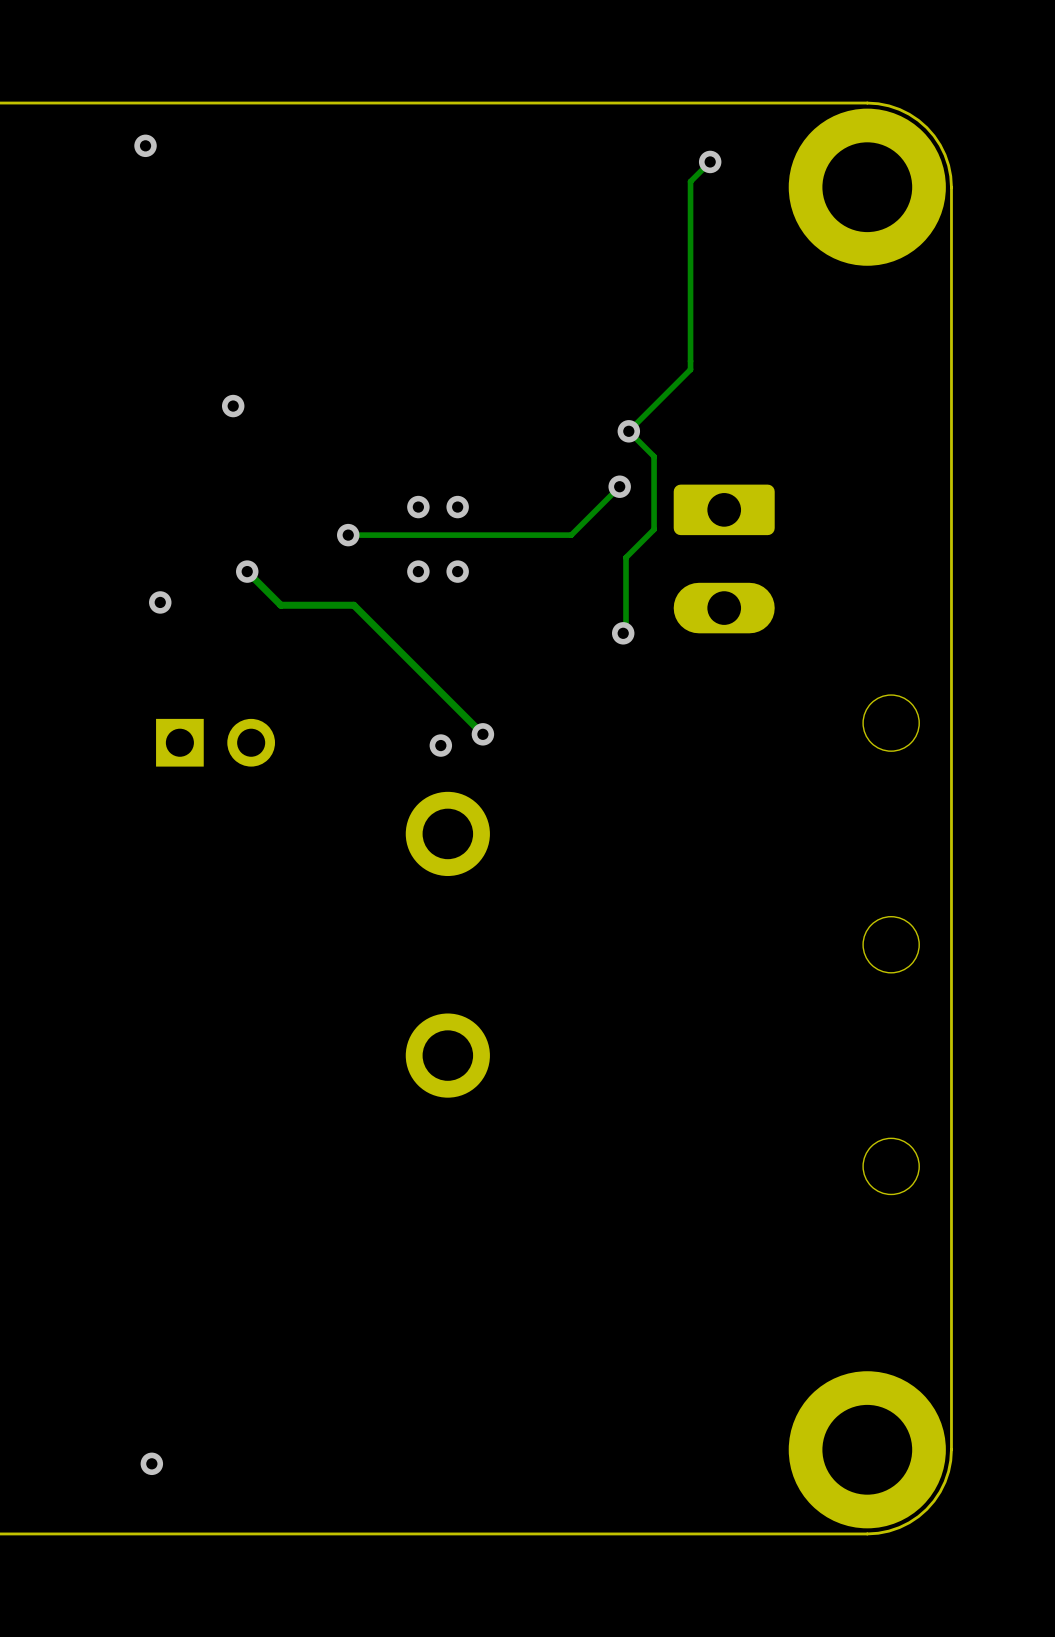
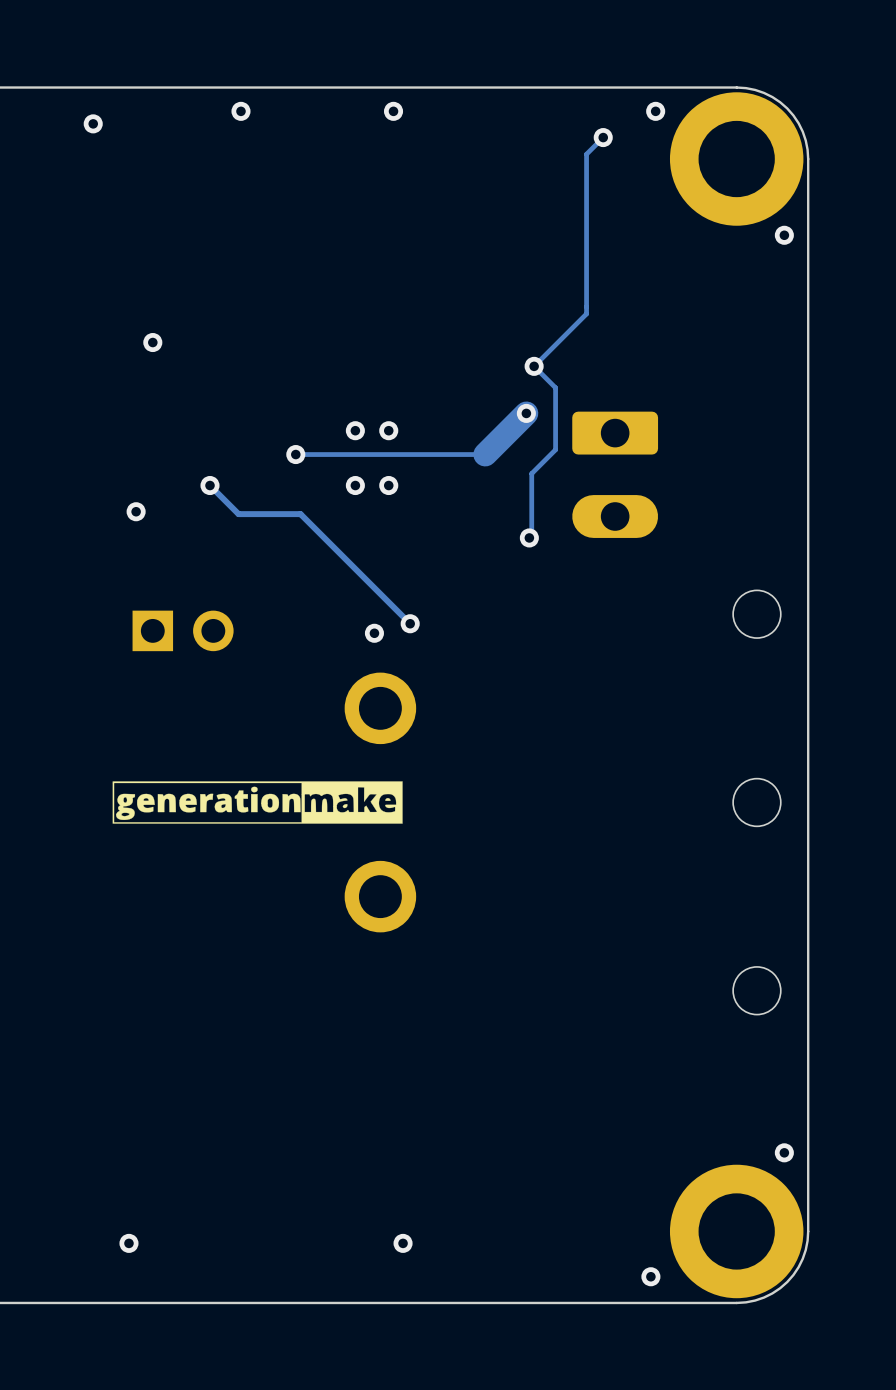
via: none -> (240, 111)
via: none -> (393, 111)
via: none -> (655, 111)
via position: (145, 145) -> (93, 123)
via: none -> (784, 235)
via position: (233, 406) -> (152, 342)
track width: thin (619, 486) (571, 535) -> thick (526, 413) (485, 454)
drawing: none -> [112, 781, 403, 824]
via: none -> (784, 1152)
via: none -> (403, 1243)
via: none -> (650, 1276)

